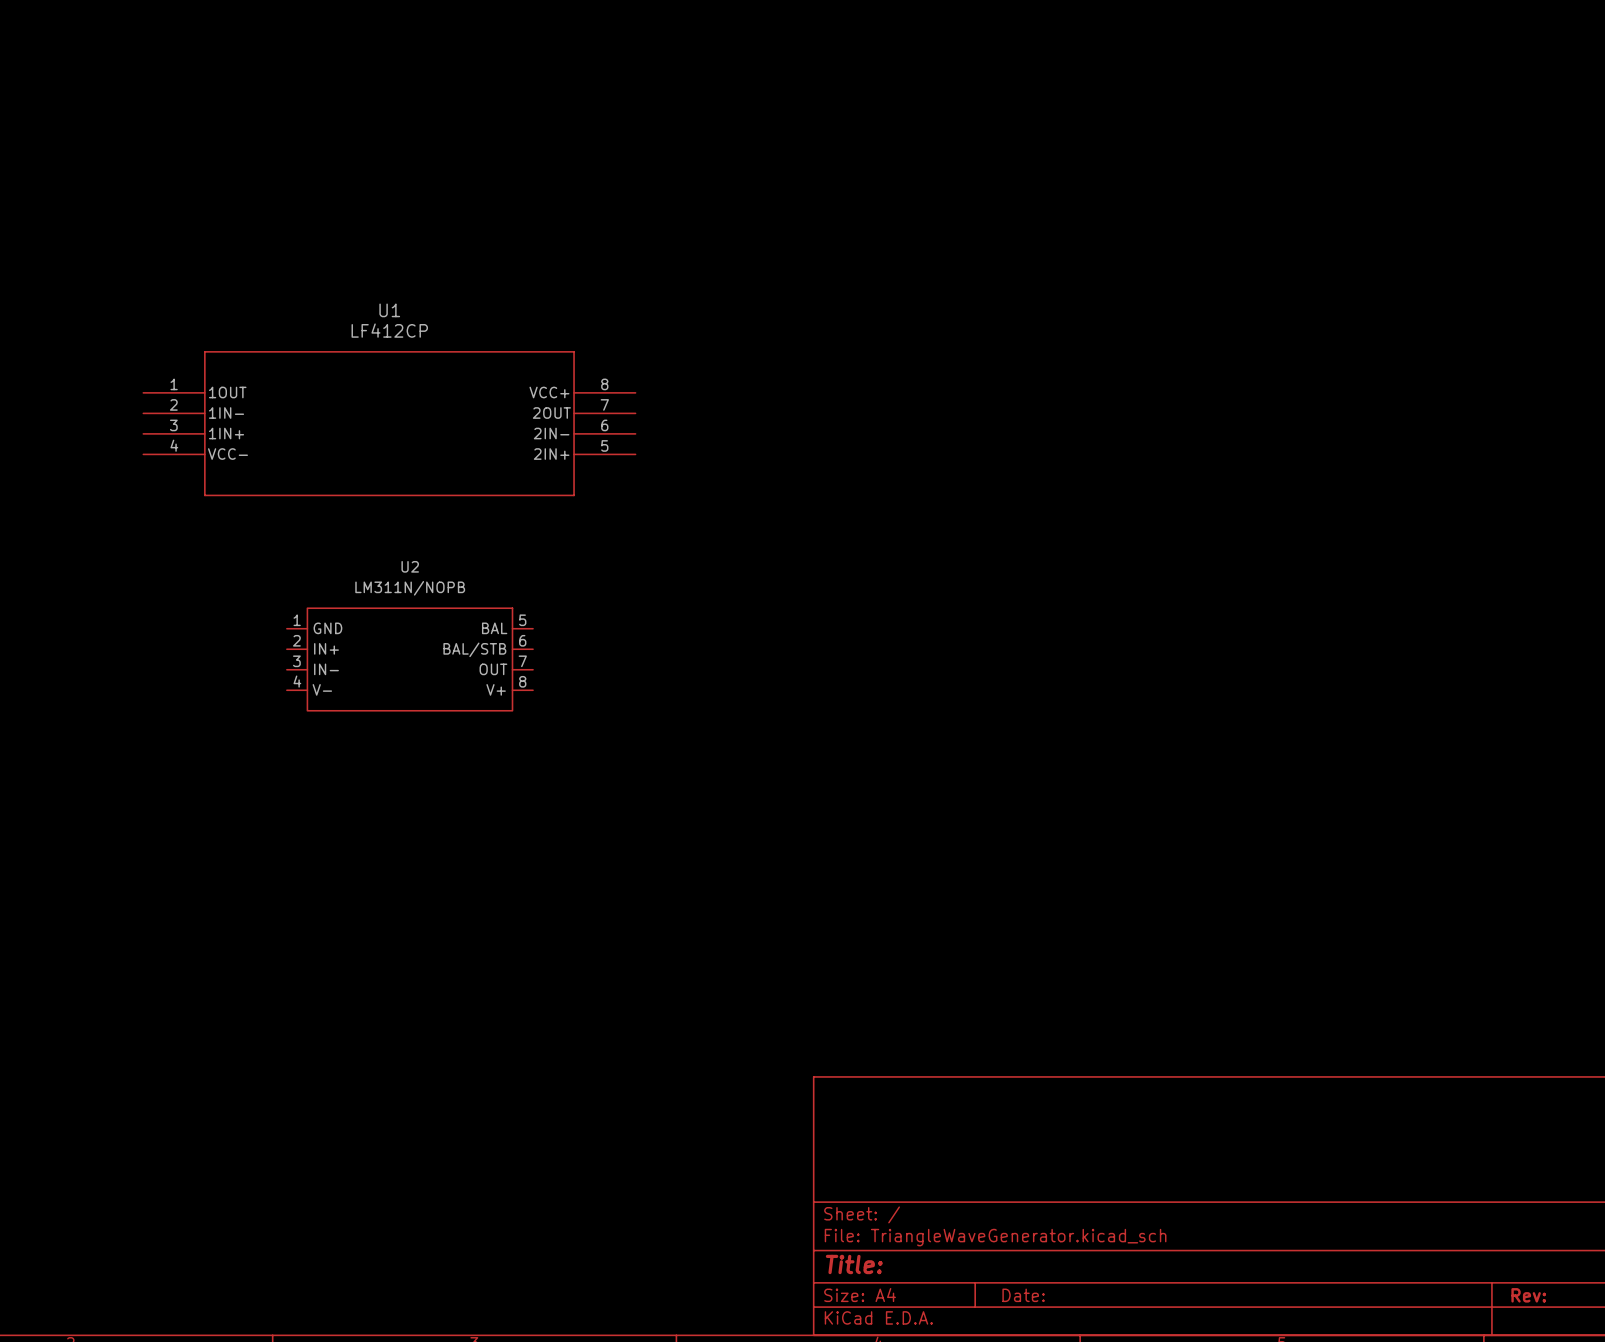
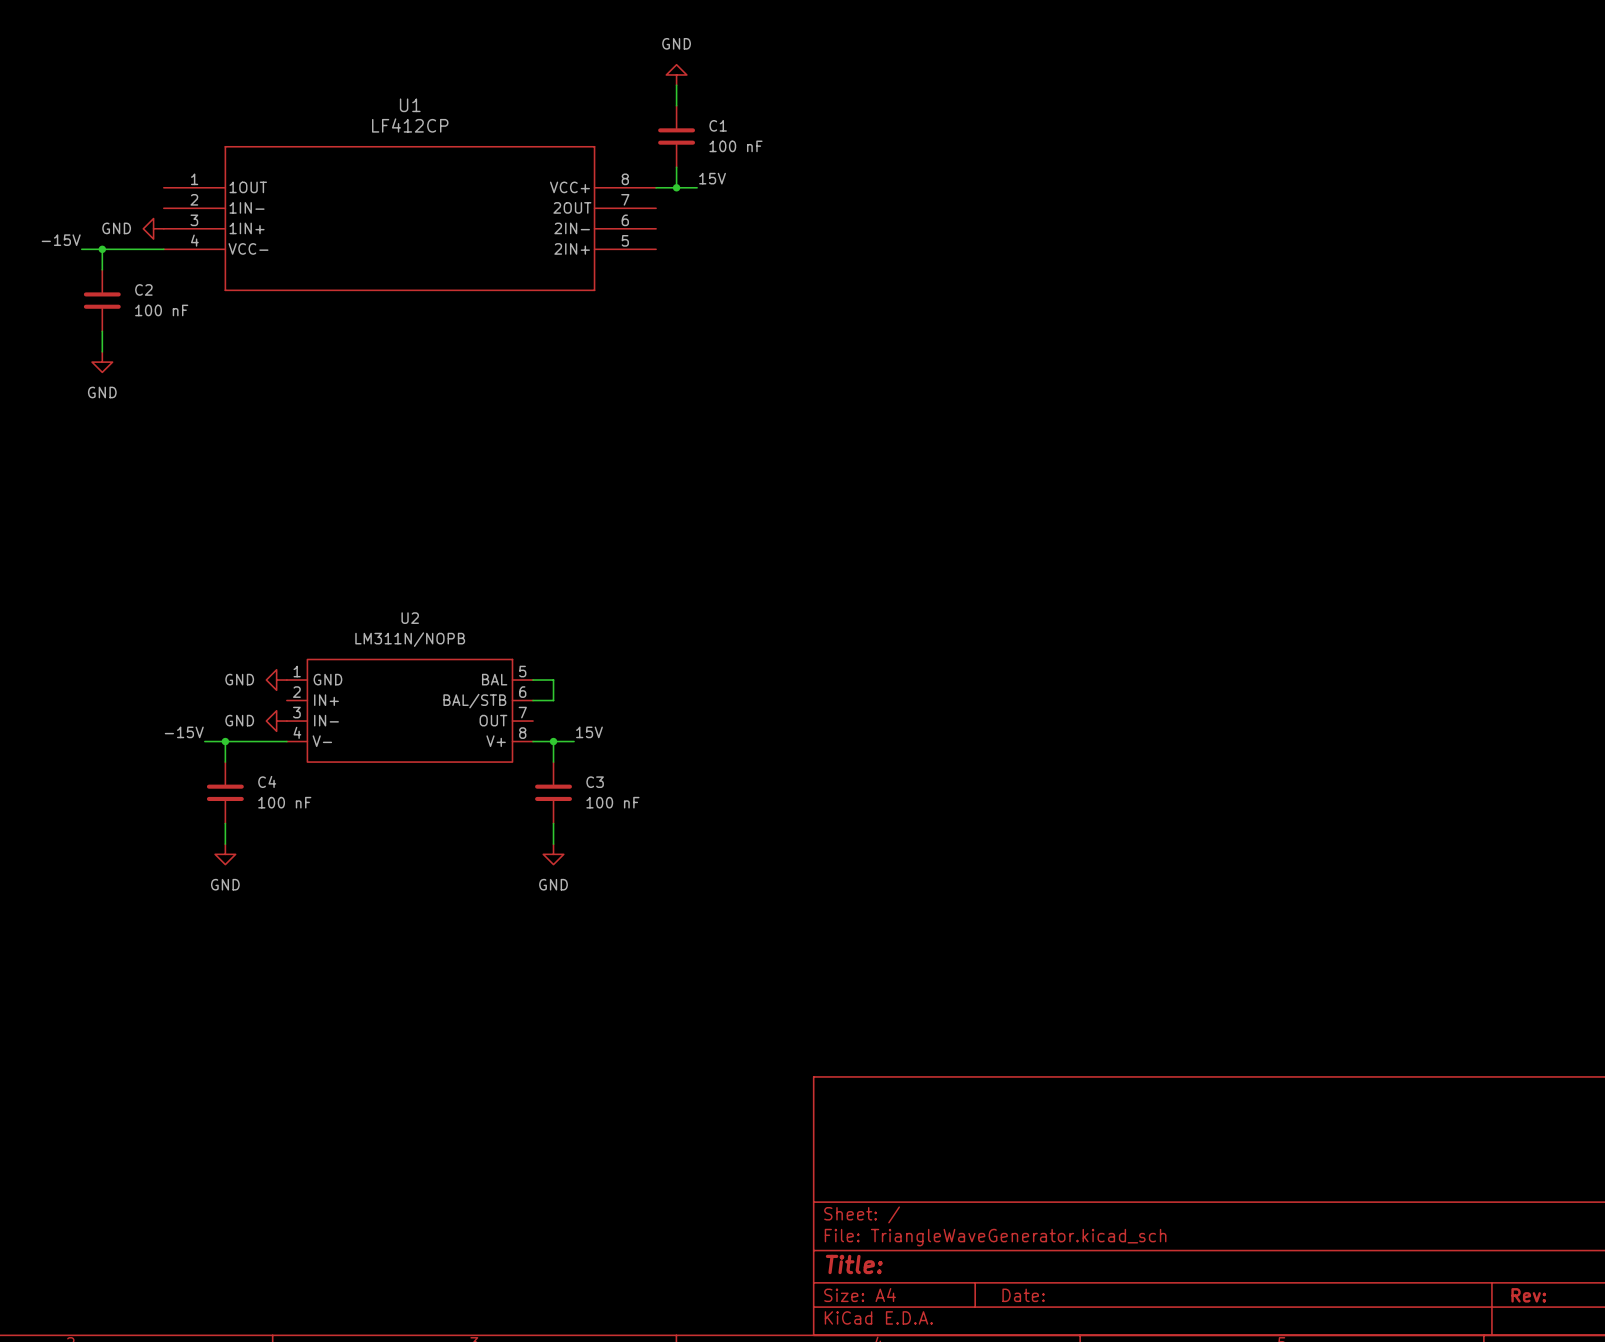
power symbol: none -> GND (676, 74)
wire: none -> (676, 85) (676, 105)
C1: none -> 100 nF (676, 136)
wire: none -> (676, 167) (676, 187)
label: none -> 15V (712, 178)
wire: none -> (656, 187) (697, 187)
junction: none -> (676, 187)
power symbol: none -> GND (153, 228)
label: none -> -15V (61, 240)
wire: none -> (81, 249) (163, 249)
wire: none -> (102, 249) (102, 269)
junction: none -> (102, 249)
C2: none -> 100 nF (102, 300)
wire: none -> (102, 331) (102, 351)
power symbol: none -> GND (102, 362)
U1 position: (389, 423) -> (409, 218)
U2 position: (409, 659) -> (409, 710)
power symbol: none -> GND (276, 680)
wire: none -> (533, 680) (553, 680) (553, 700) (533, 700)
power symbol: none -> GND (276, 721)
label: none -> -15V (184, 732)
label: none -> 15V (589, 732)
wire: none -> (204, 741) (286, 741)
wire: none -> (225, 741) (225, 762)
junction: none -> (225, 741)
wire: none -> (533, 741) (574, 741)
wire: none -> (553, 741) (553, 762)
junction: none -> (553, 741)
C4: none -> 100 nF (225, 792)
C3: none -> 100 nF (553, 792)
wire: none -> (225, 823) (225, 844)
wire: none -> (553, 823) (553, 844)
power symbol: none -> GND (225, 854)
power symbol: none -> GND (553, 854)

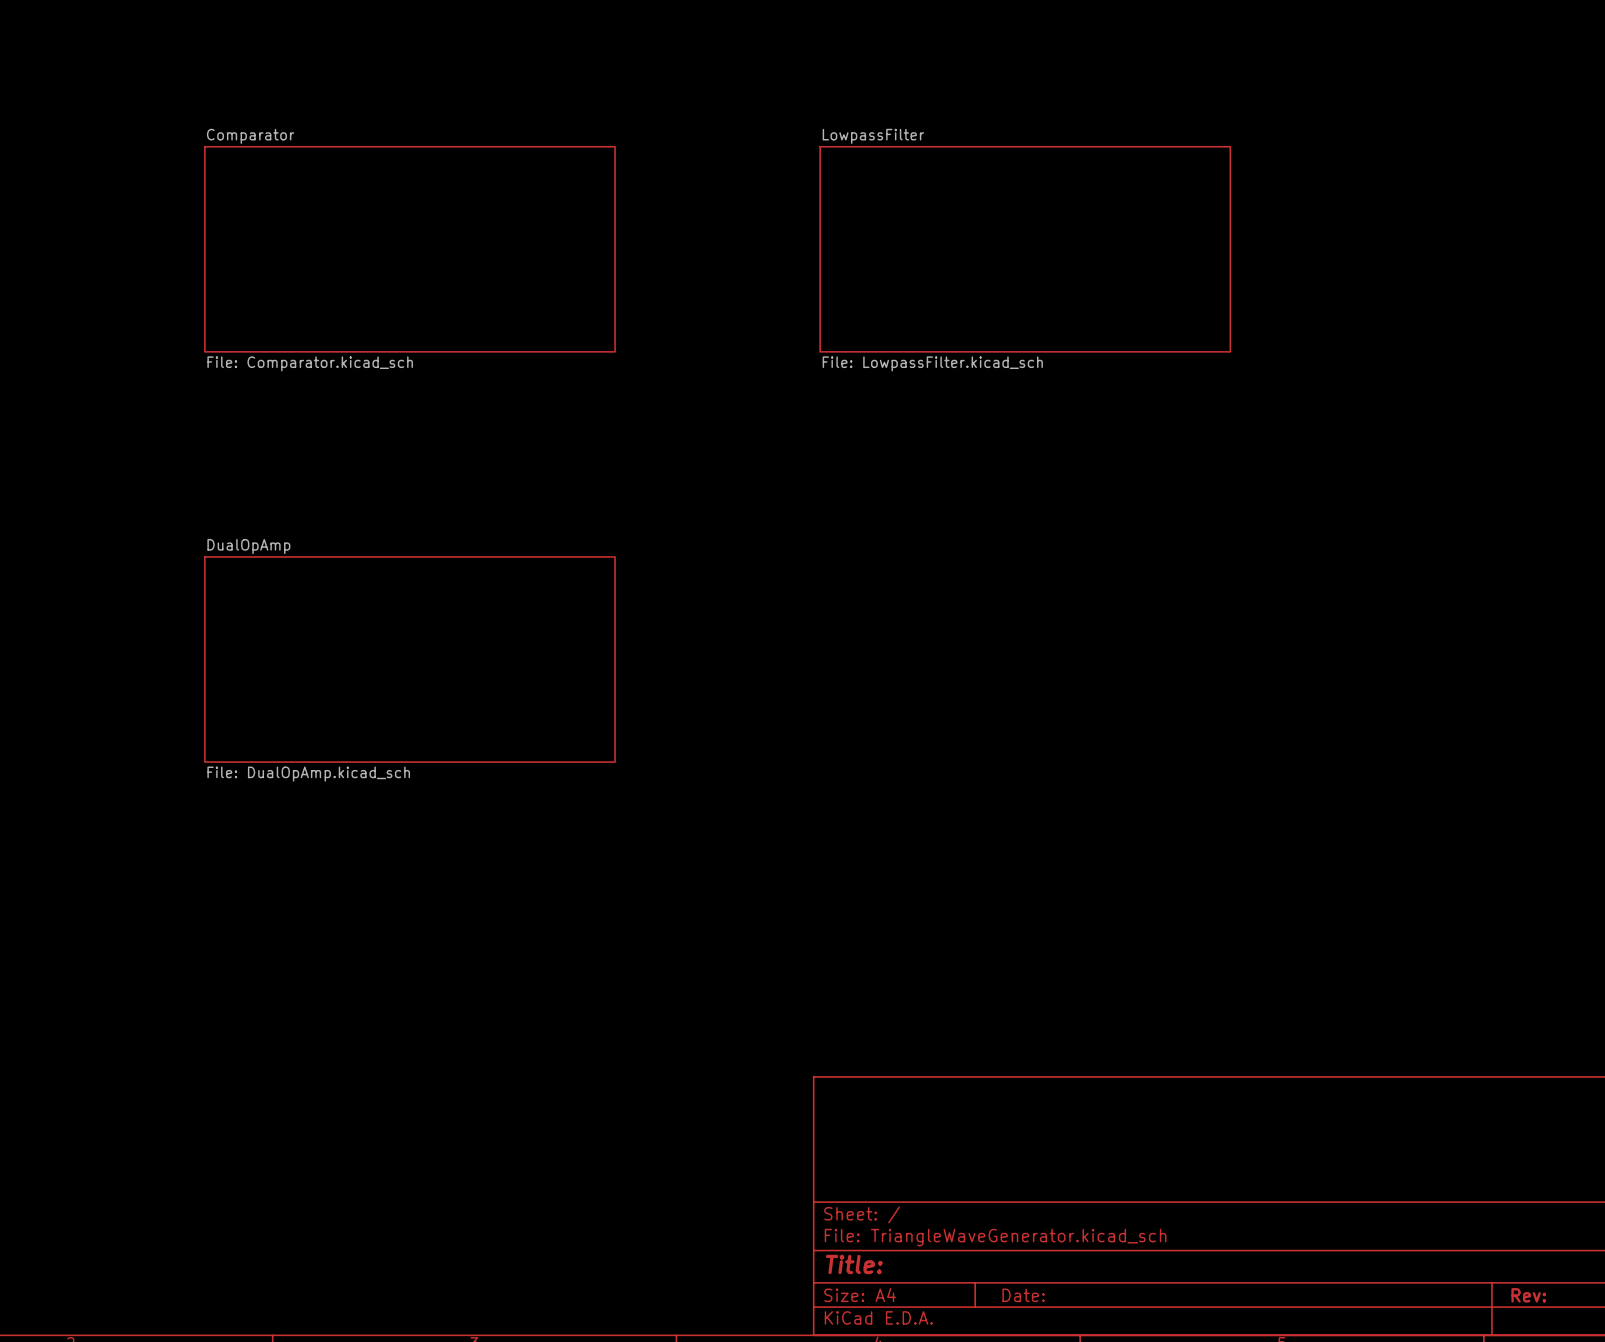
power symbol: GND (676, 74) -> none
wire: (676, 85) (676, 105) -> none
C1: 100 nF (676, 136) -> none
wire: (676, 167) (676, 187) -> none
label: 15V (712, 178) -> none
wire: (656, 187) (697, 187) -> none
junction: (676, 187) -> none
U1: LF412CP (409, 218) -> none
power symbol: GND (153, 228) -> none
label: -15V (61, 240) -> none
wire: (81, 249) (163, 249) -> none
wire: (102, 249) (102, 269) -> none
junction: (102, 249) -> none
sheet Comparator: none -> File: Comparator.kicad_sch (409, 249)
sheet LowpassFilter: none -> File: LowpassFilter.kicad_sch (1025, 249)
C2: 100 nF (102, 300) -> none
wire: (102, 331) (102, 351) -> none
power symbol: GND (102, 362) -> none
sheet DualOpAmp: none -> File: DualOpAmp.kicad_sch (409, 659)
power symbol: GND (276, 680) -> none
wire: (533, 680) (553, 680) (553, 700) (533, 700) -> none
U2: LM311N/NOPB (409, 710) -> none
power symbol: GND (276, 721) -> none
label: -15V (184, 732) -> none
label: 15V (589, 732) -> none
wire: (204, 741) (286, 741) -> none
wire: (225, 741) (225, 762) -> none
junction: (225, 741) -> none
wire: (533, 741) (574, 741) -> none
wire: (553, 741) (553, 762) -> none
junction: (553, 741) -> none
C4: 100 nF (225, 792) -> none
C3: 100 nF (553, 792) -> none
wire: (225, 823) (225, 844) -> none
wire: (553, 823) (553, 844) -> none
power symbol: GND (225, 854) -> none
power symbol: GND (553, 854) -> none

